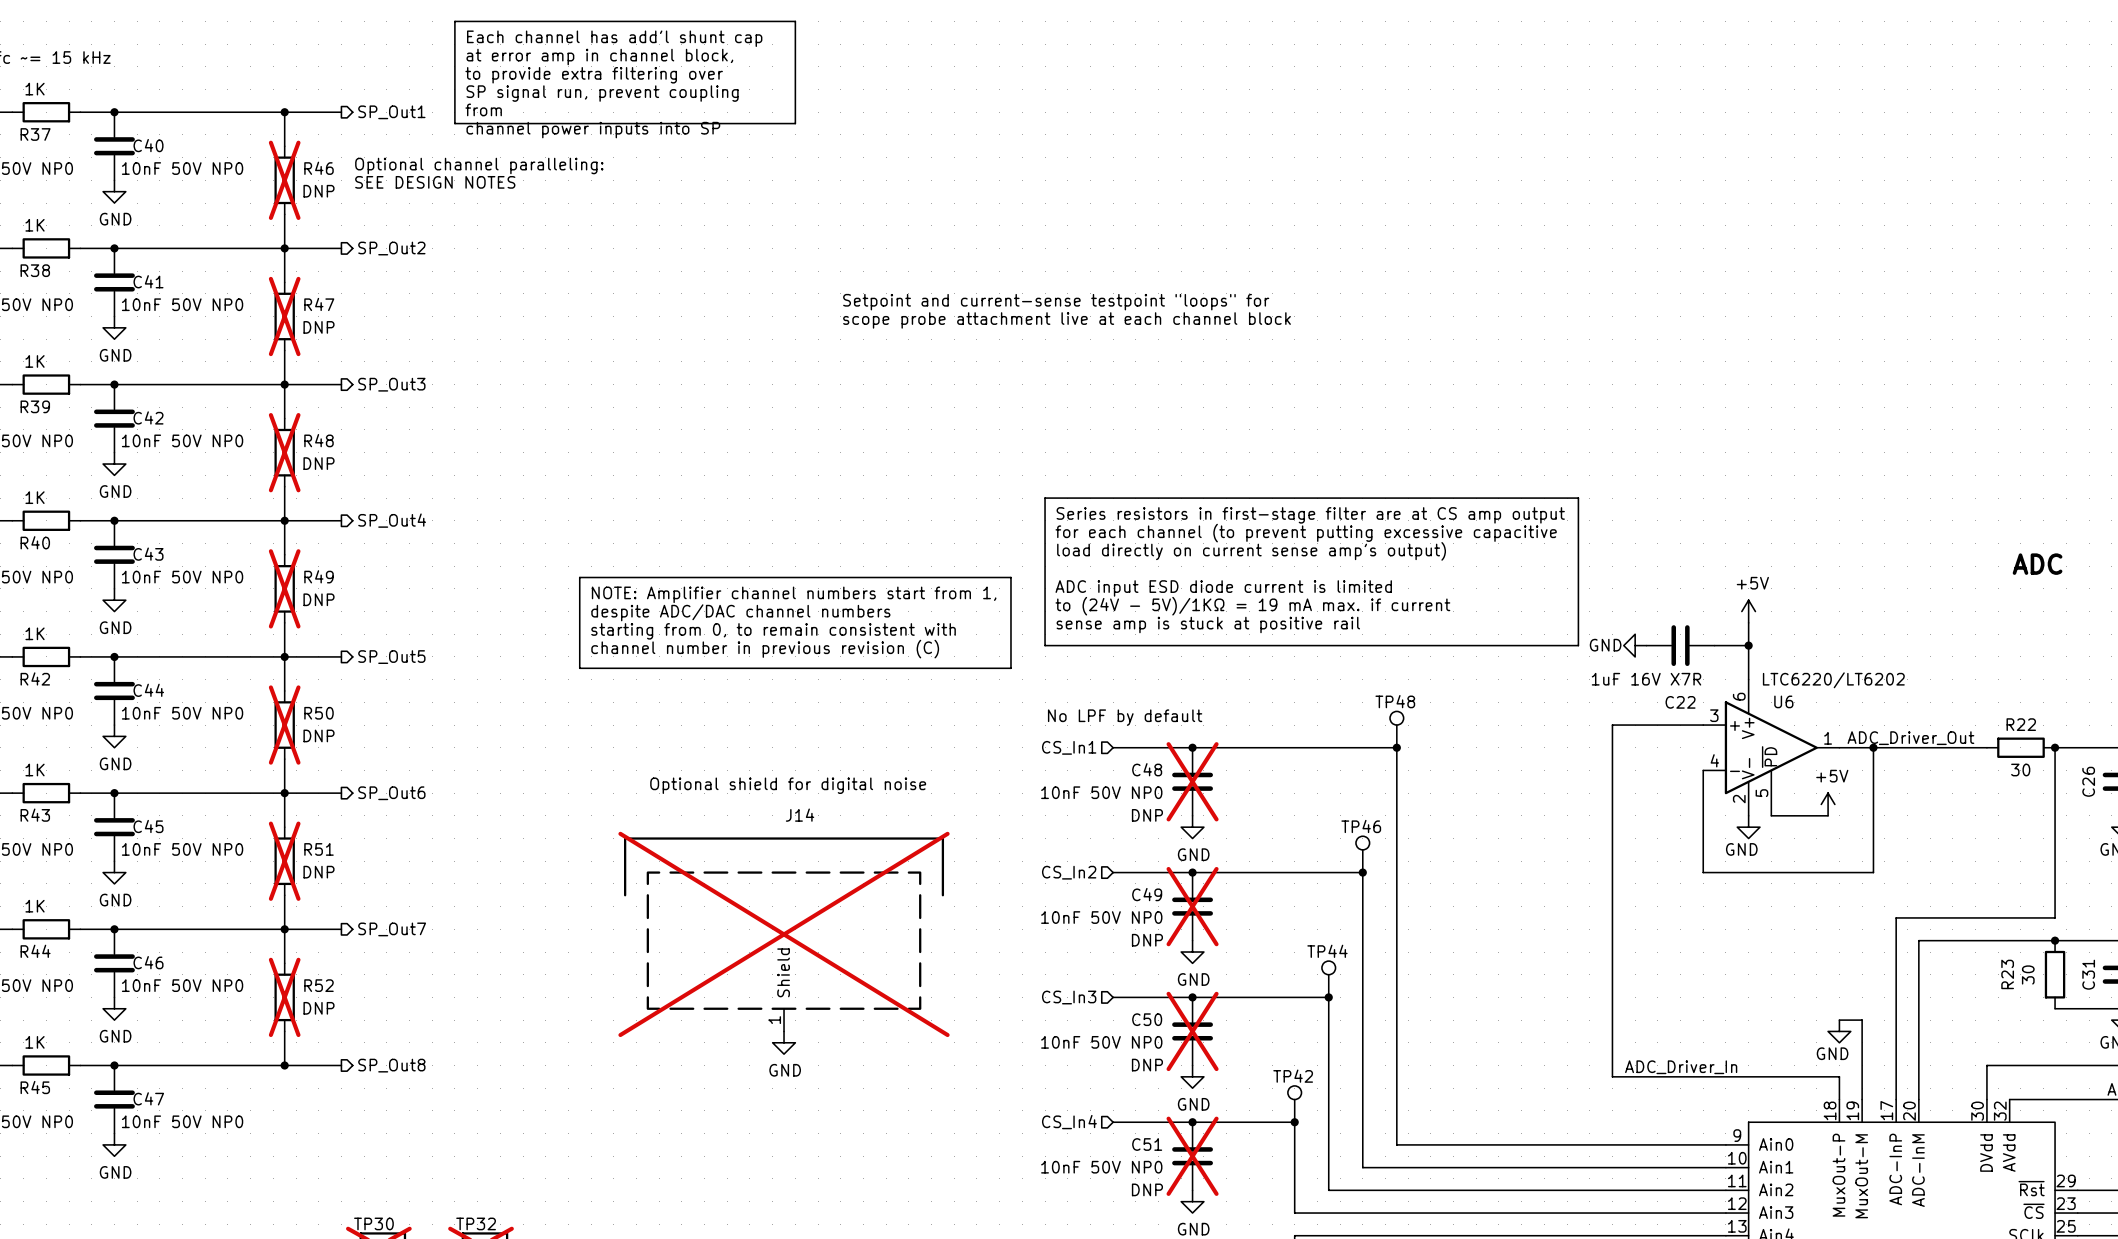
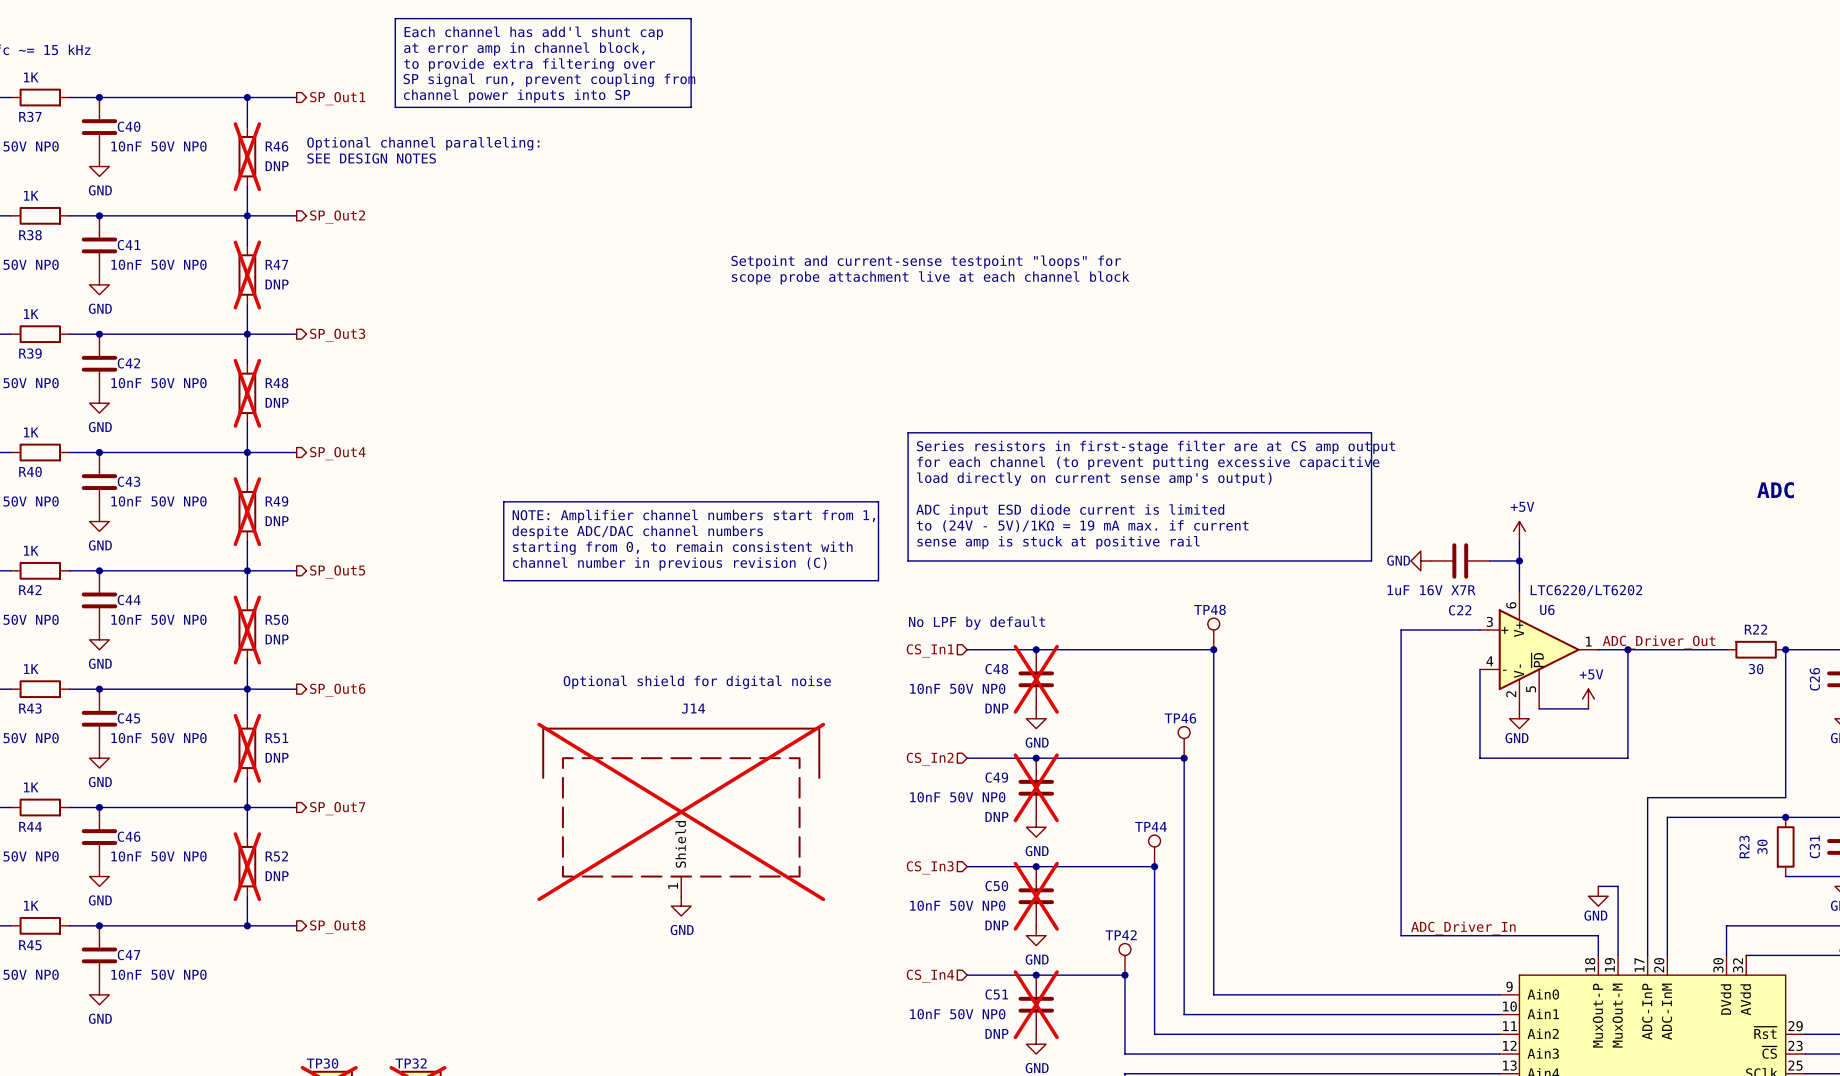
text: SP signal run, prevent coupling (602, 93) -> SP signal run, prevent coupling from (549, 80)
text: from (483, 109) -> channel power inputs into SP (517, 96)
text: channel power inputs into SP (593, 130) -> none

